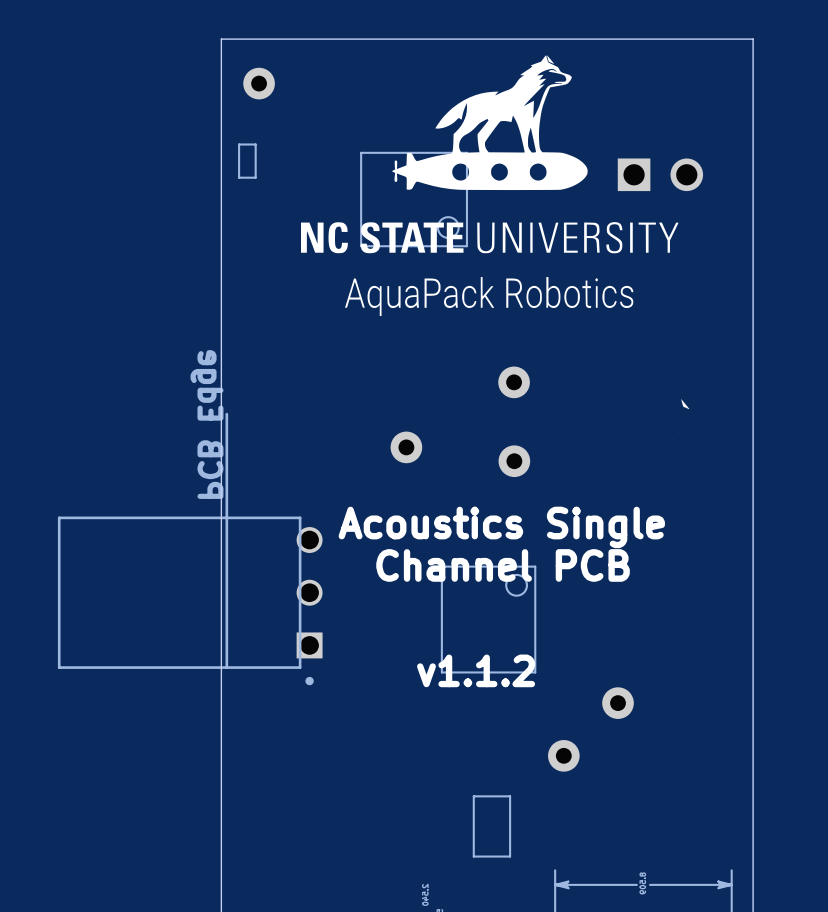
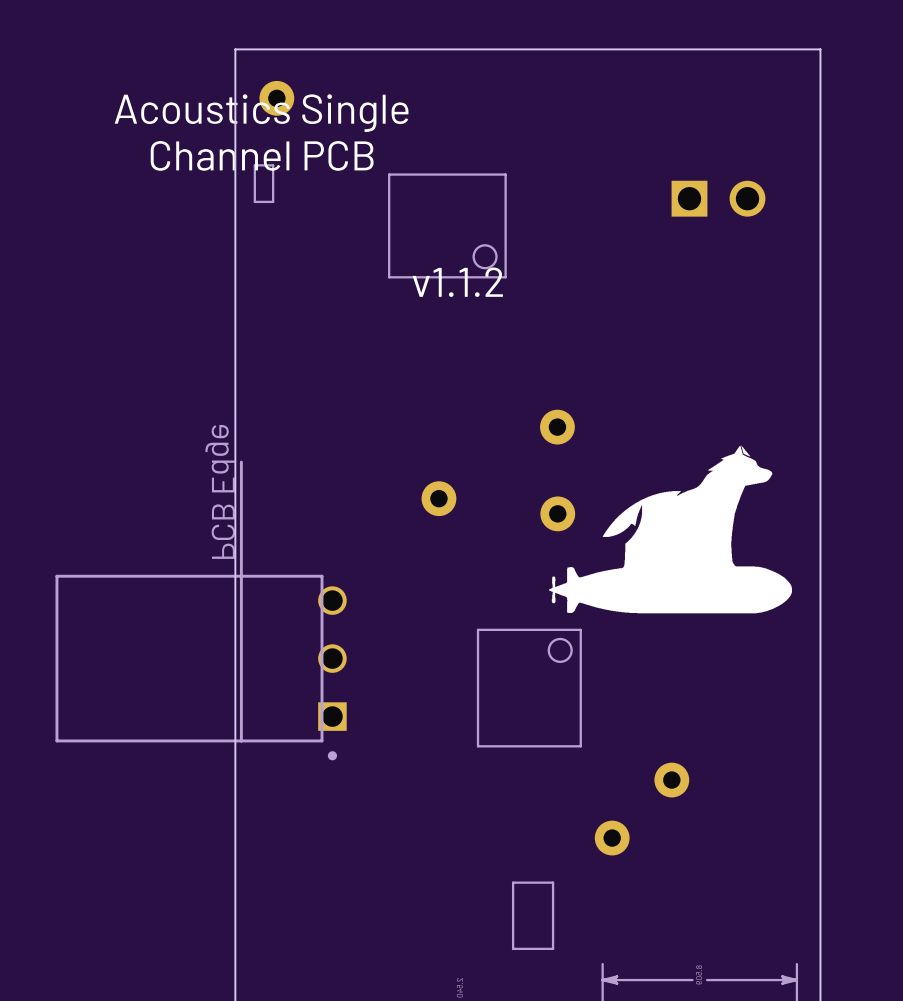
drawing: [301, 55, 679, 316] -> none
drawing: none -> [548, 445, 792, 614]
text position: Acoustics Single (501, 527) -> Acoustics Single (261, 113)
text position: Channel PCB (503, 565) -> Channel PCB (262, 155)
text position: v1.1.2 (476, 670) -> v1.1.2 (457, 282)

